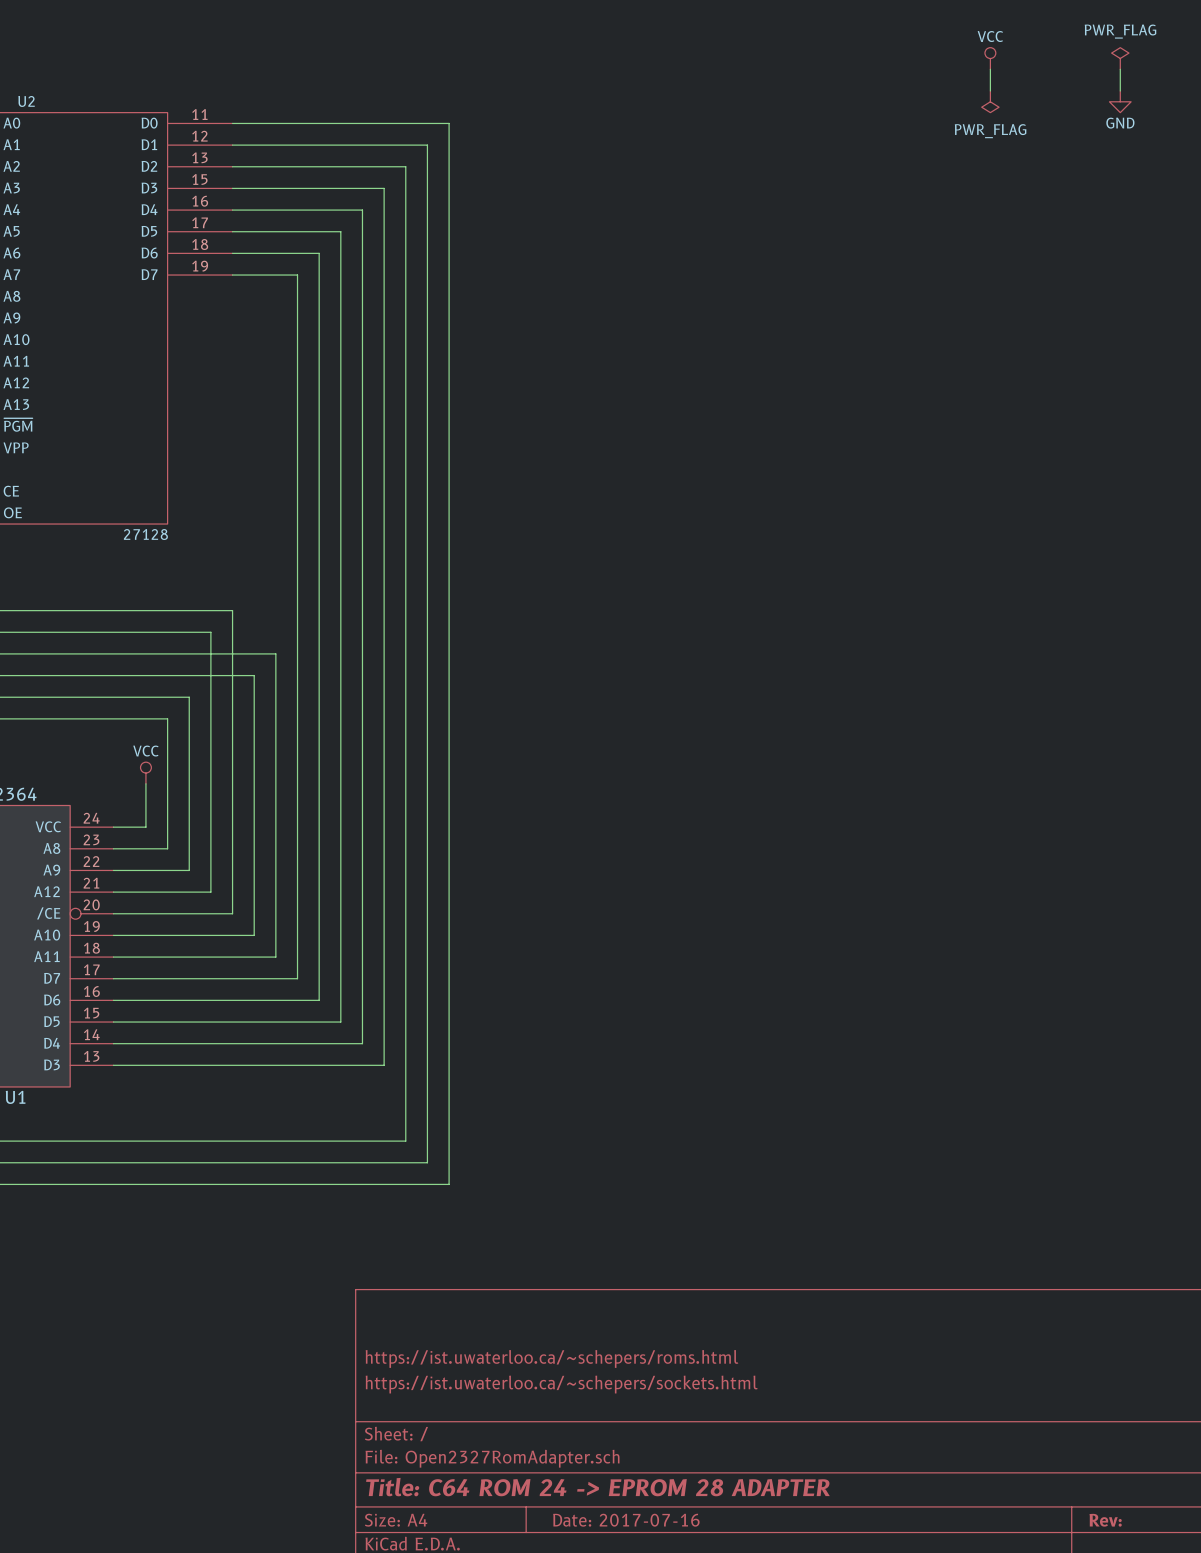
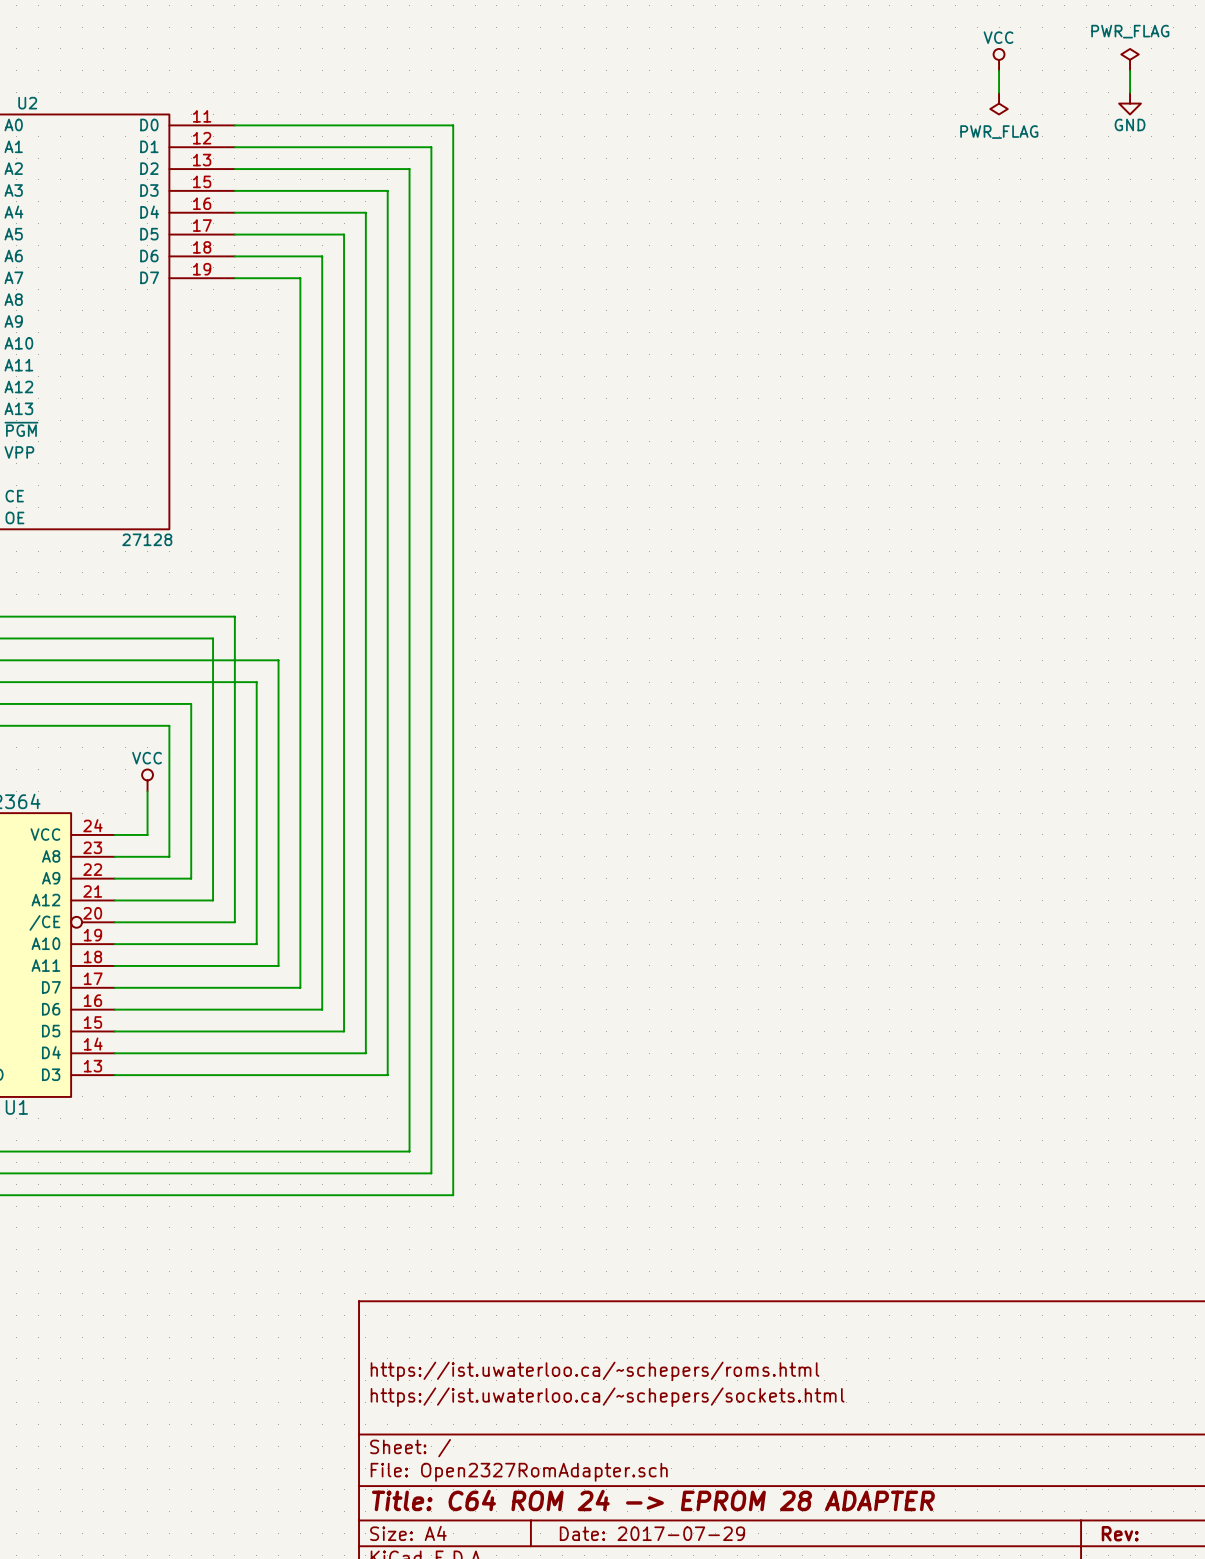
title block: Date: 2017-07-16 (626, 1520) -> Date: 2017-07-29 (652, 1533)

